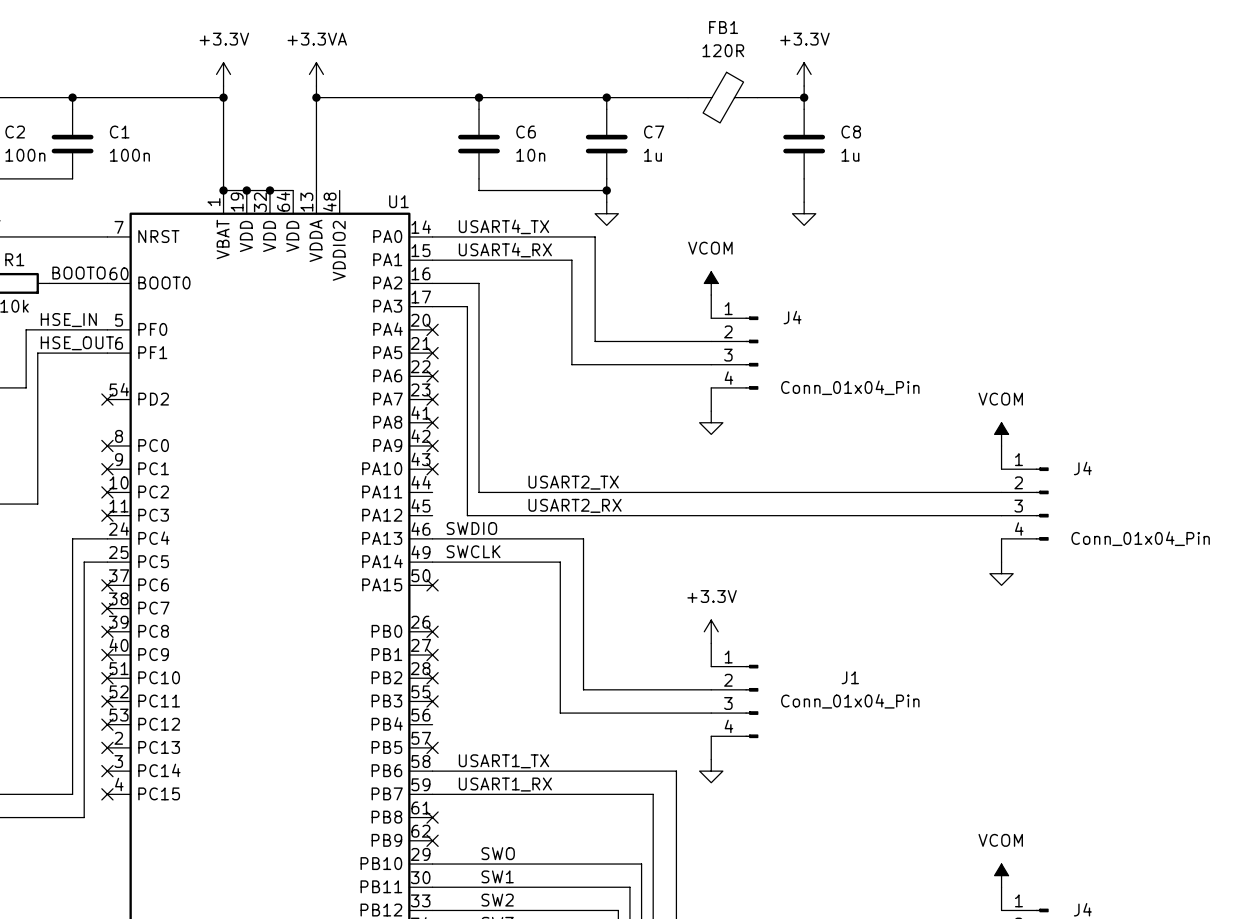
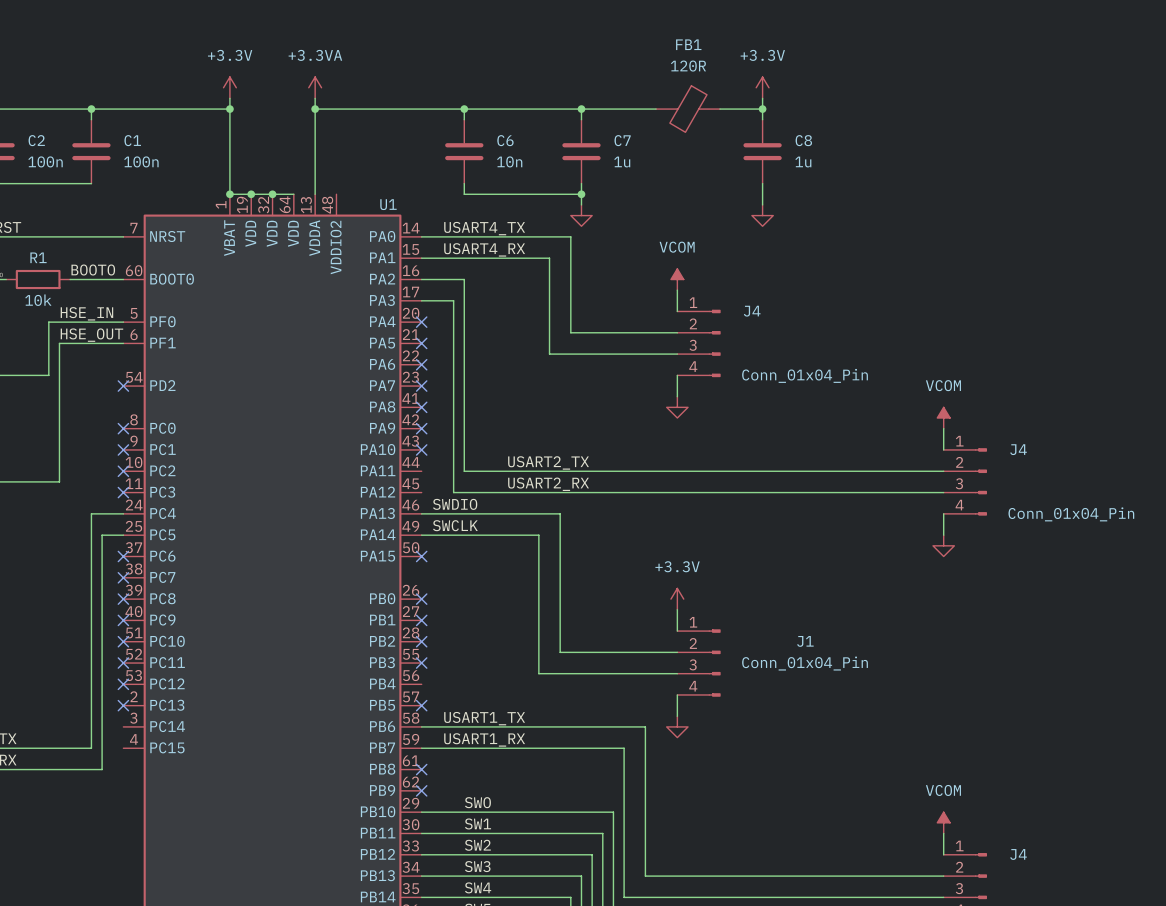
no-connect mark: (107, 771) -> none
no-connect mark: (107, 794) -> none

